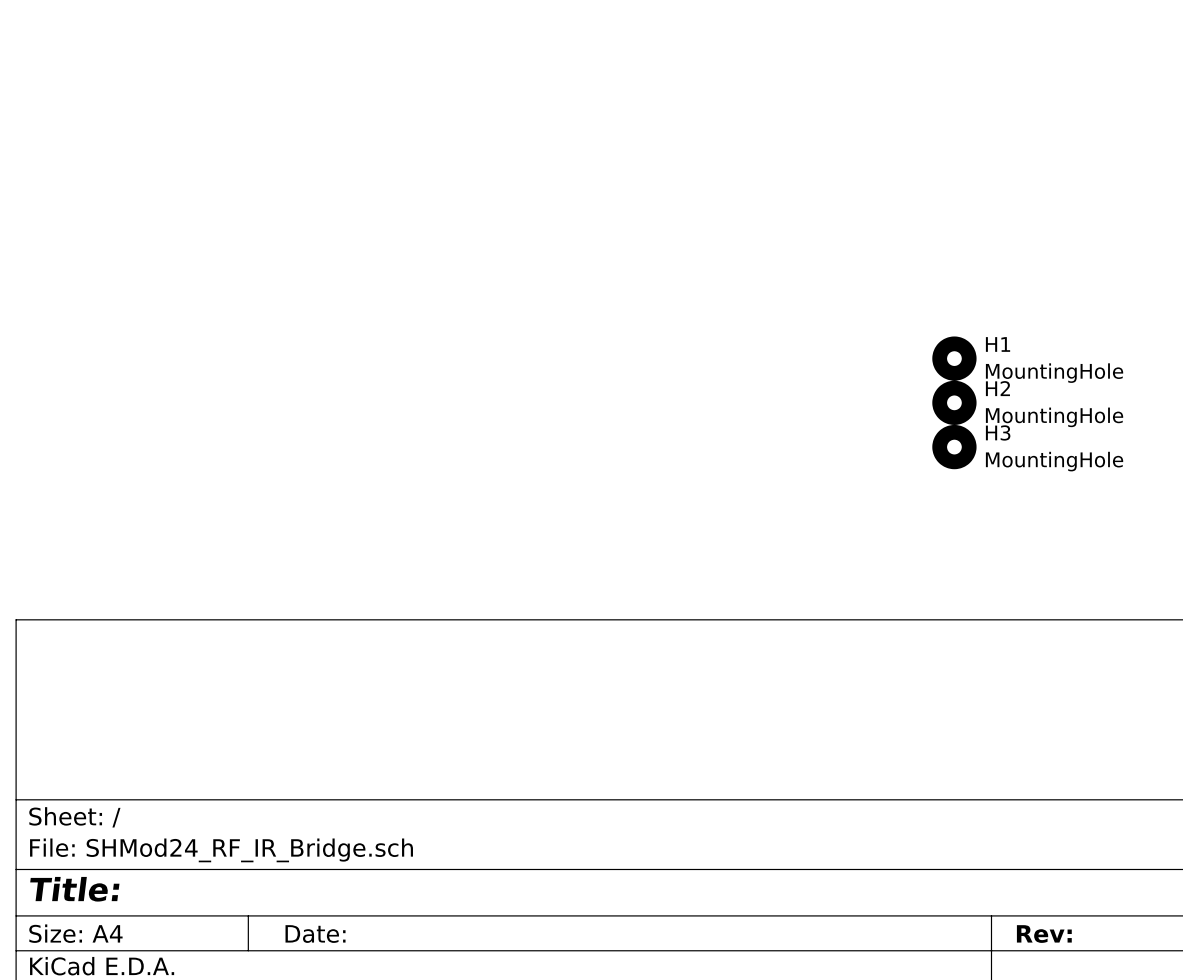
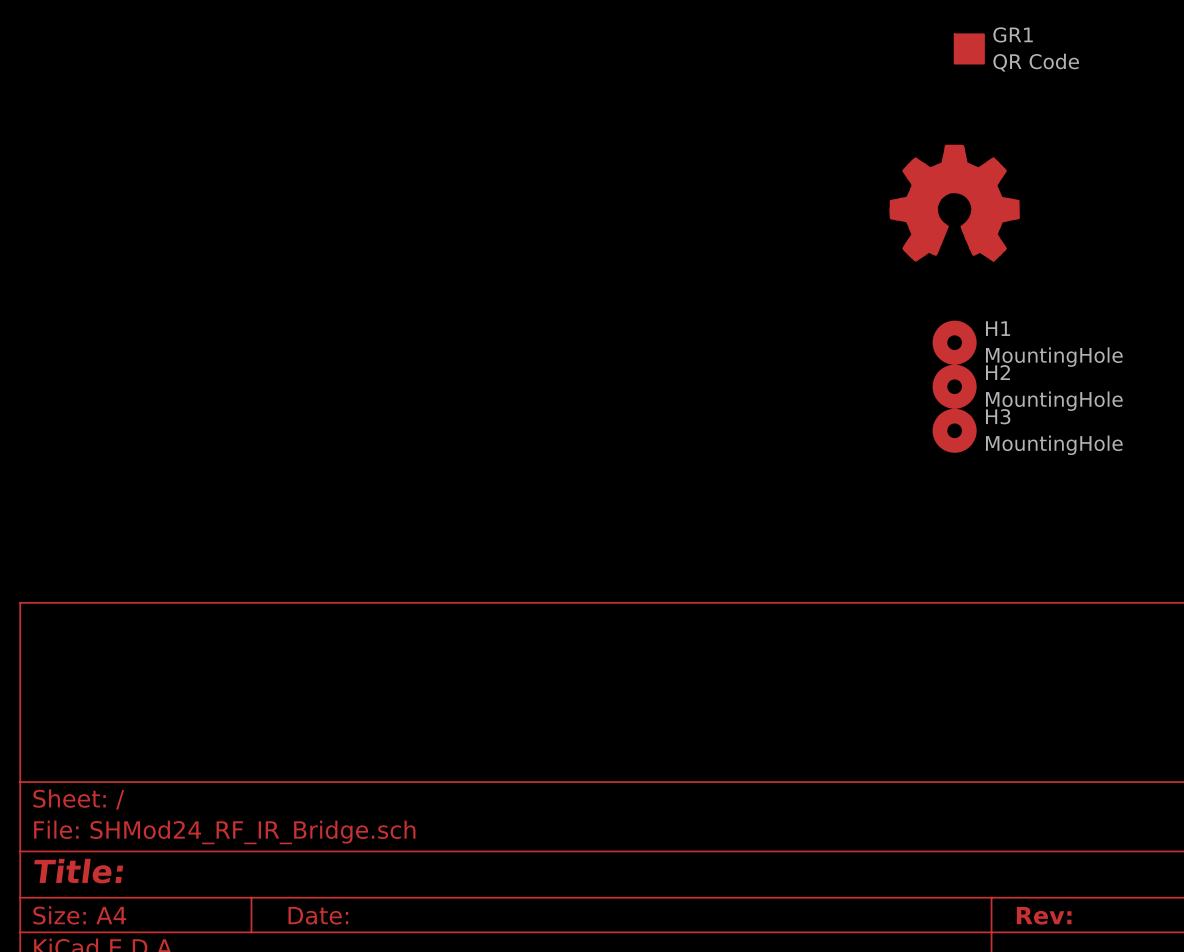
GR1: none -> QR Code (969, 48)
part: none -> (954, 203)

